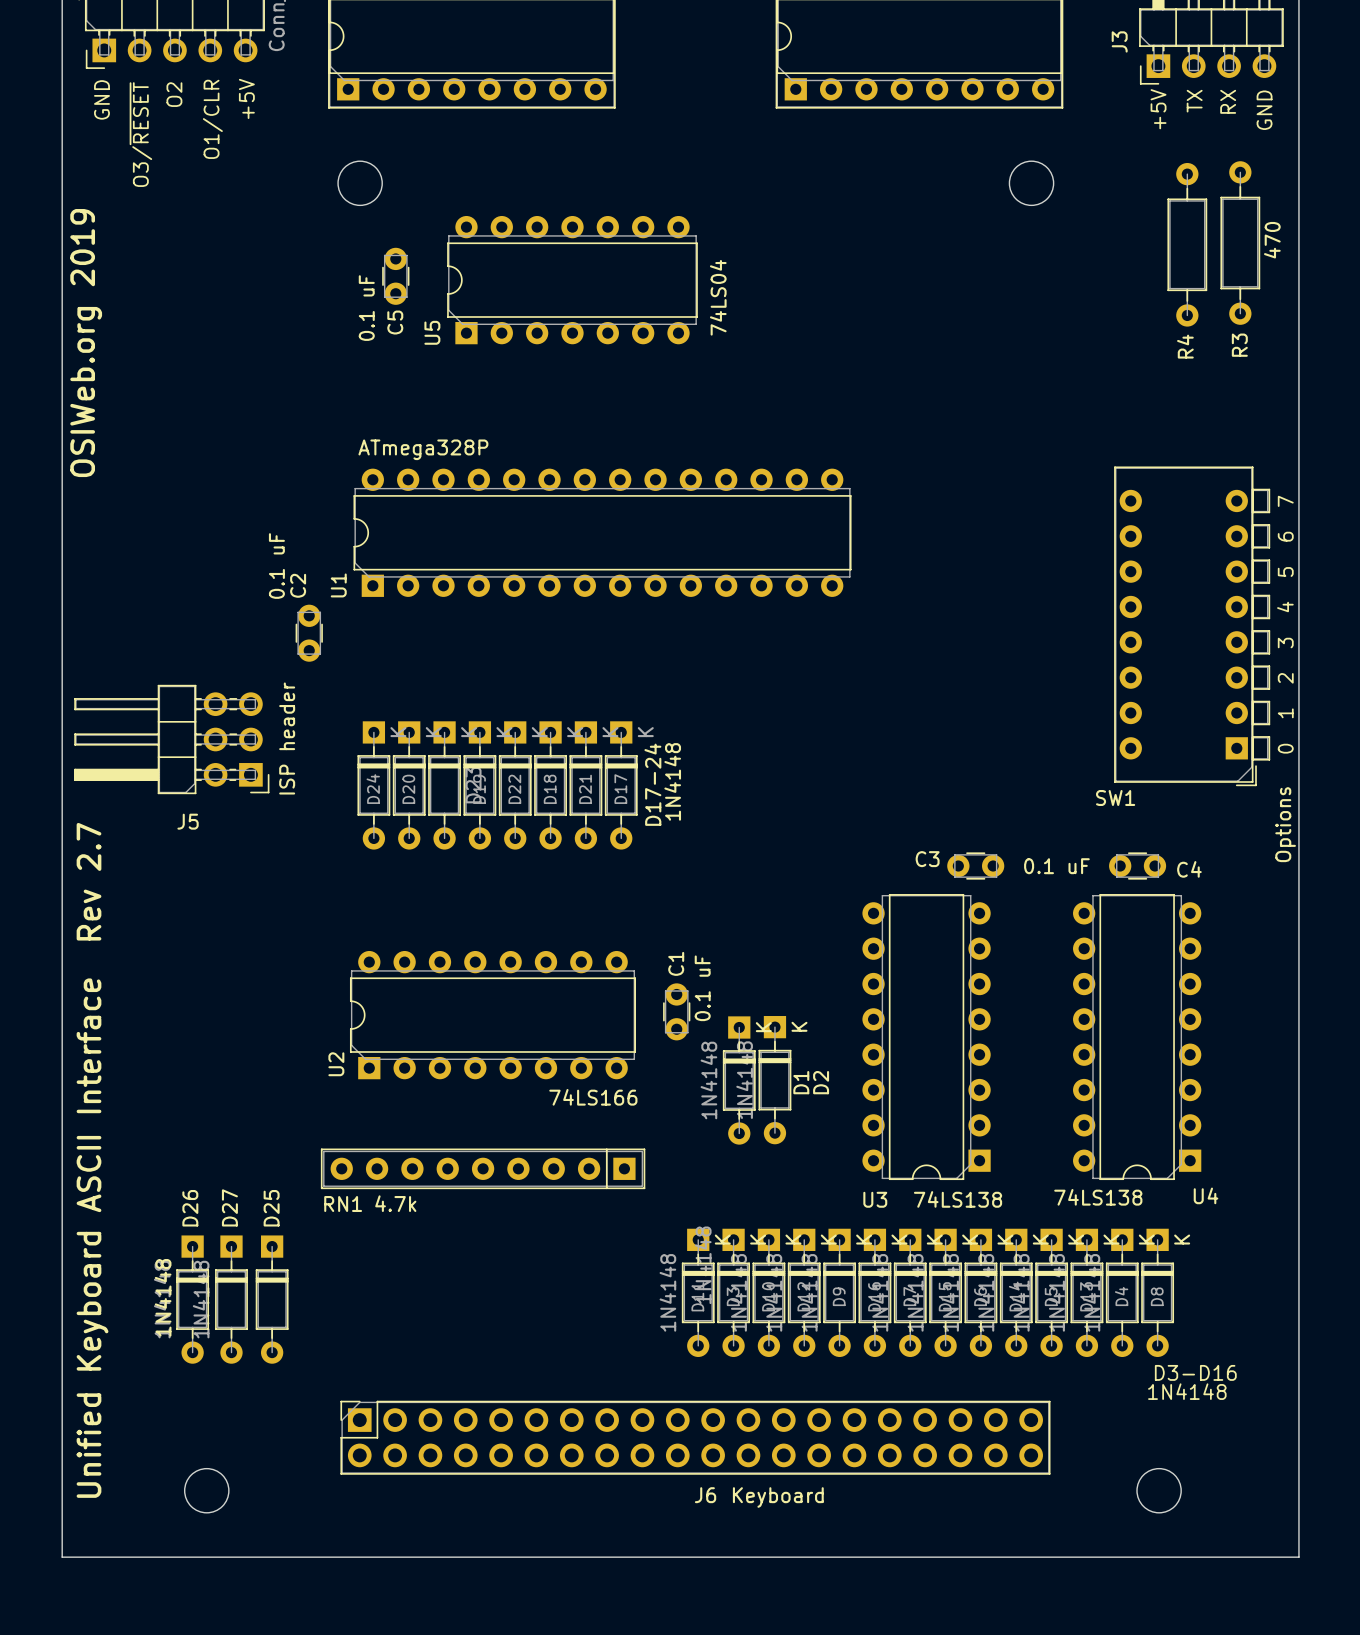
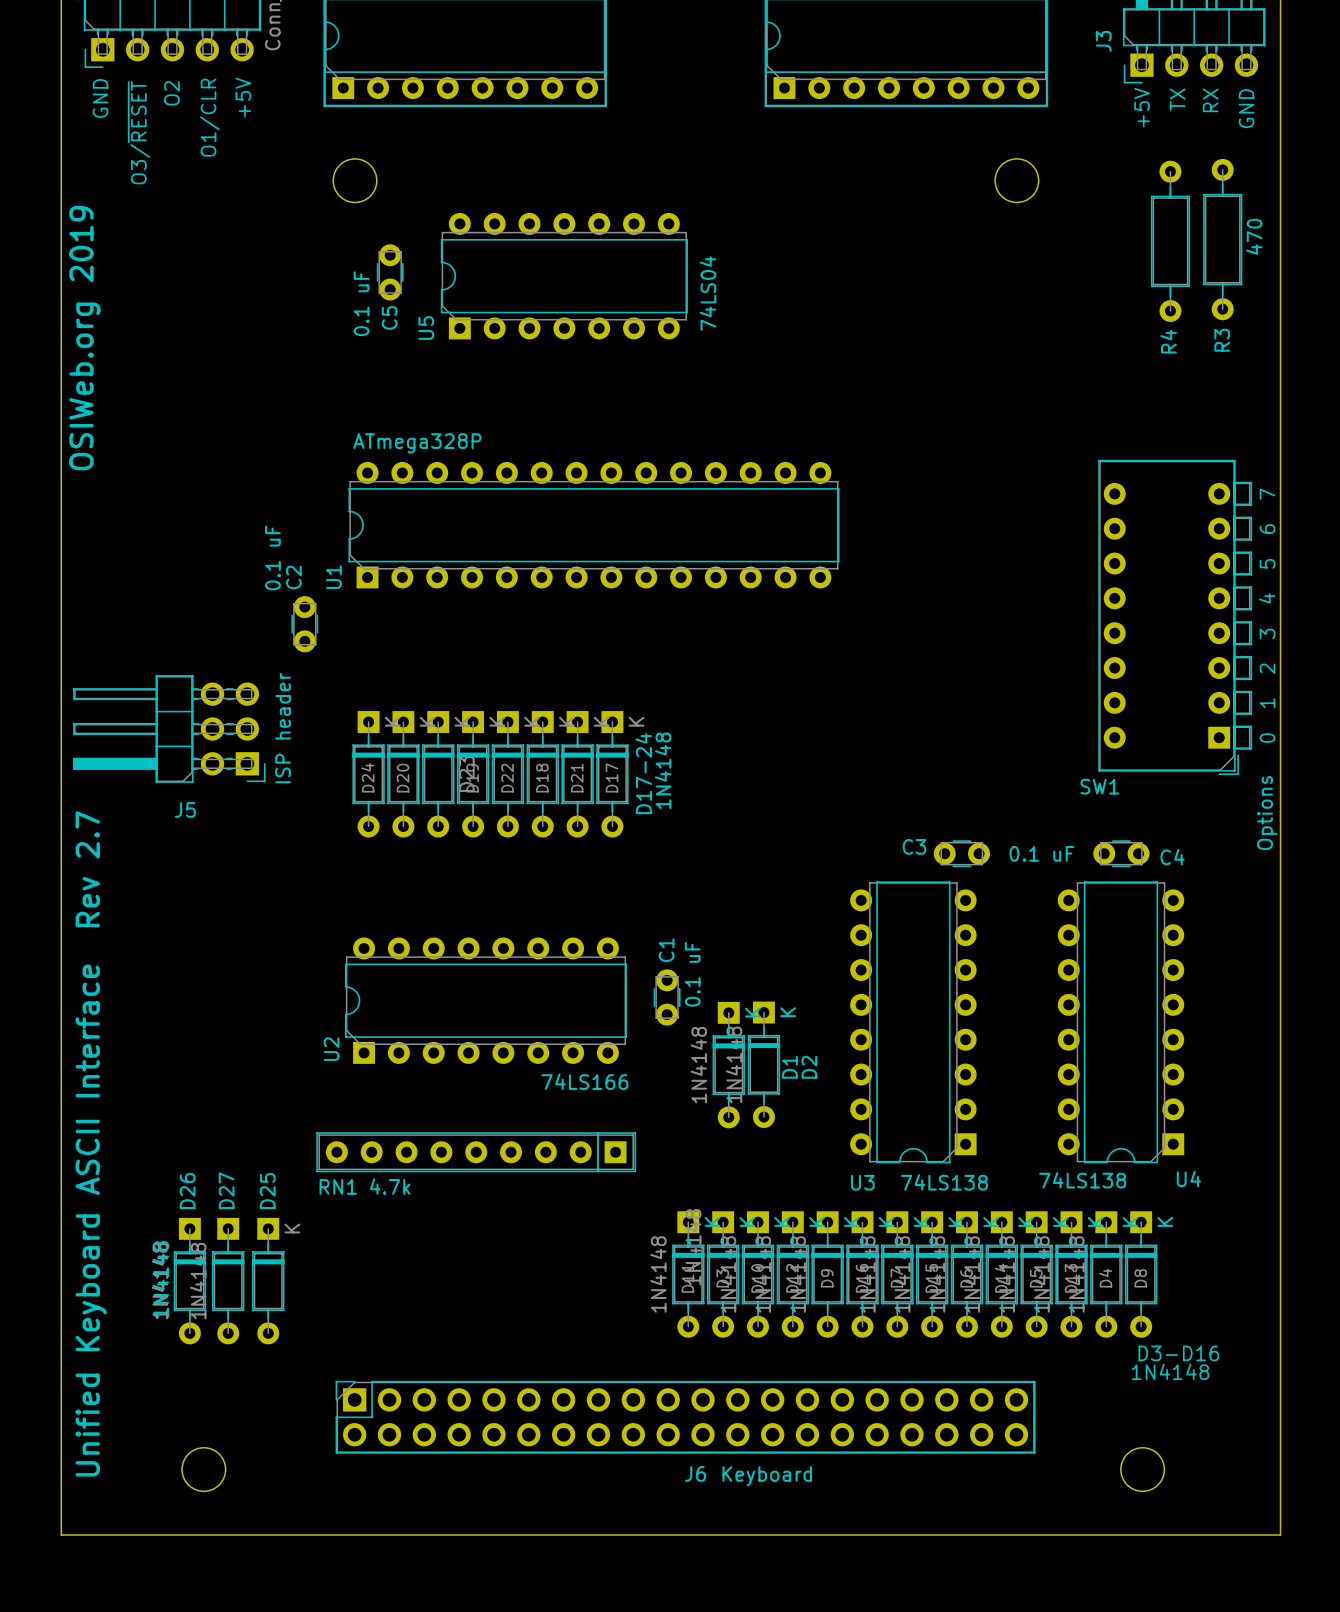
D25 text: none -> K (292, 1228)

